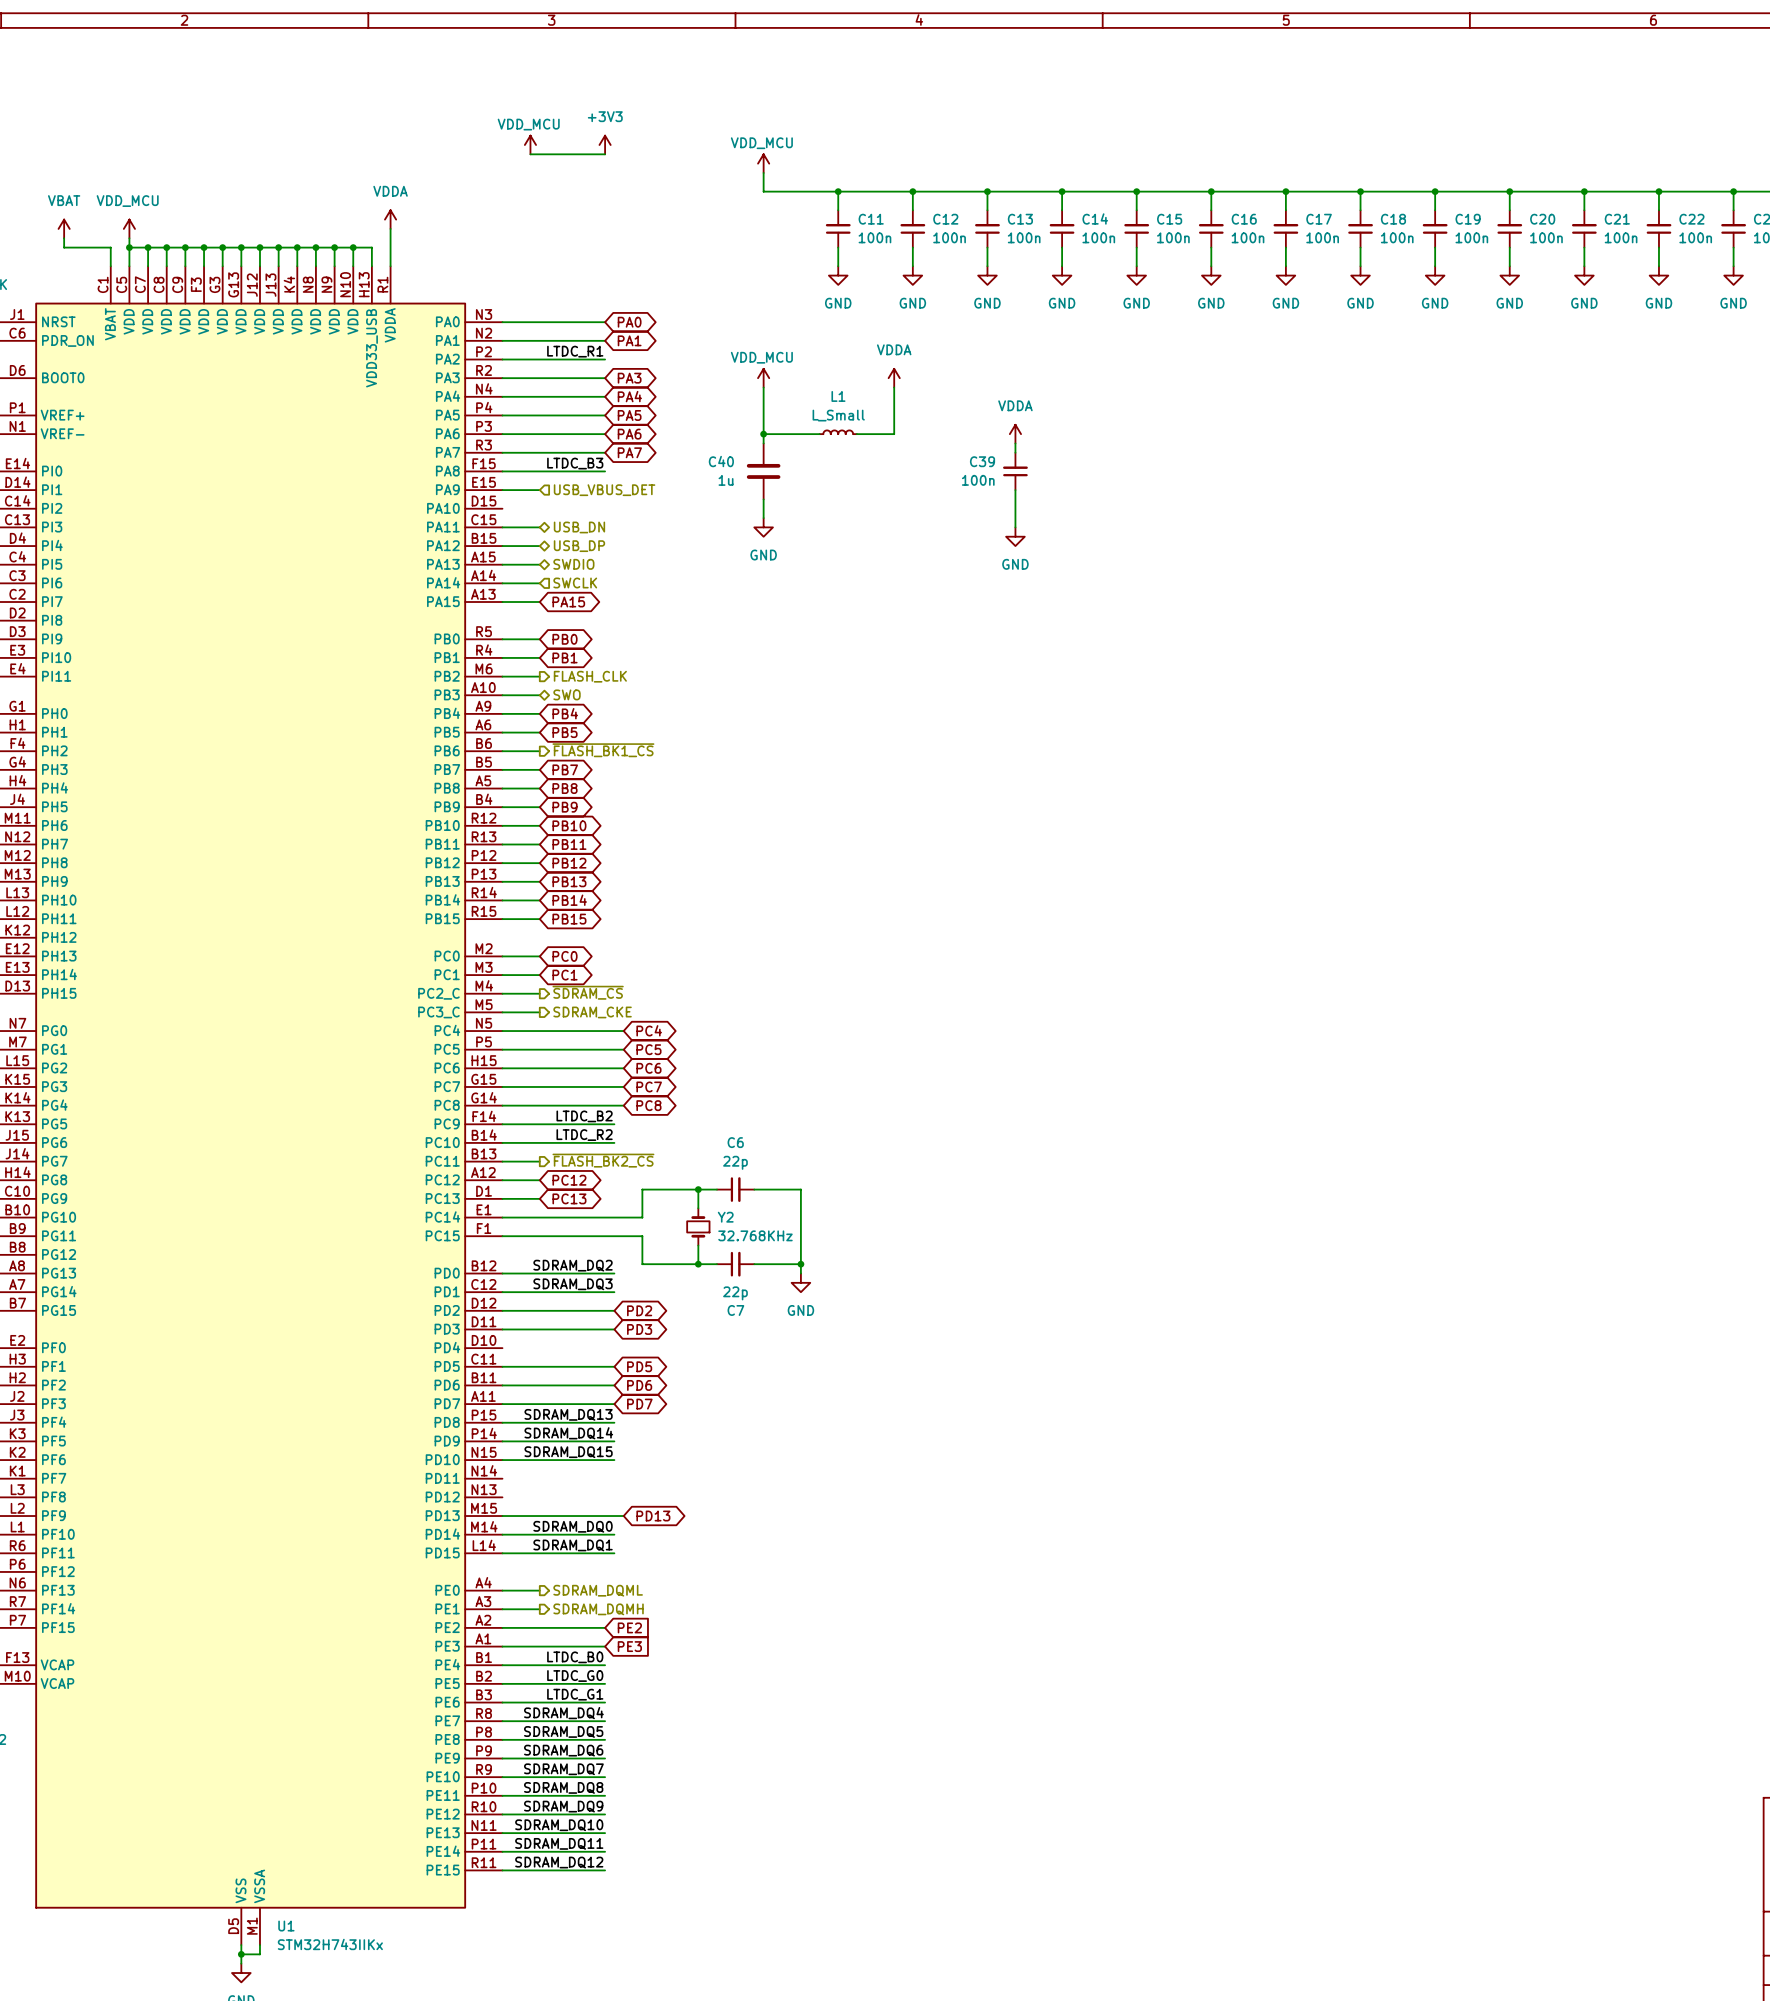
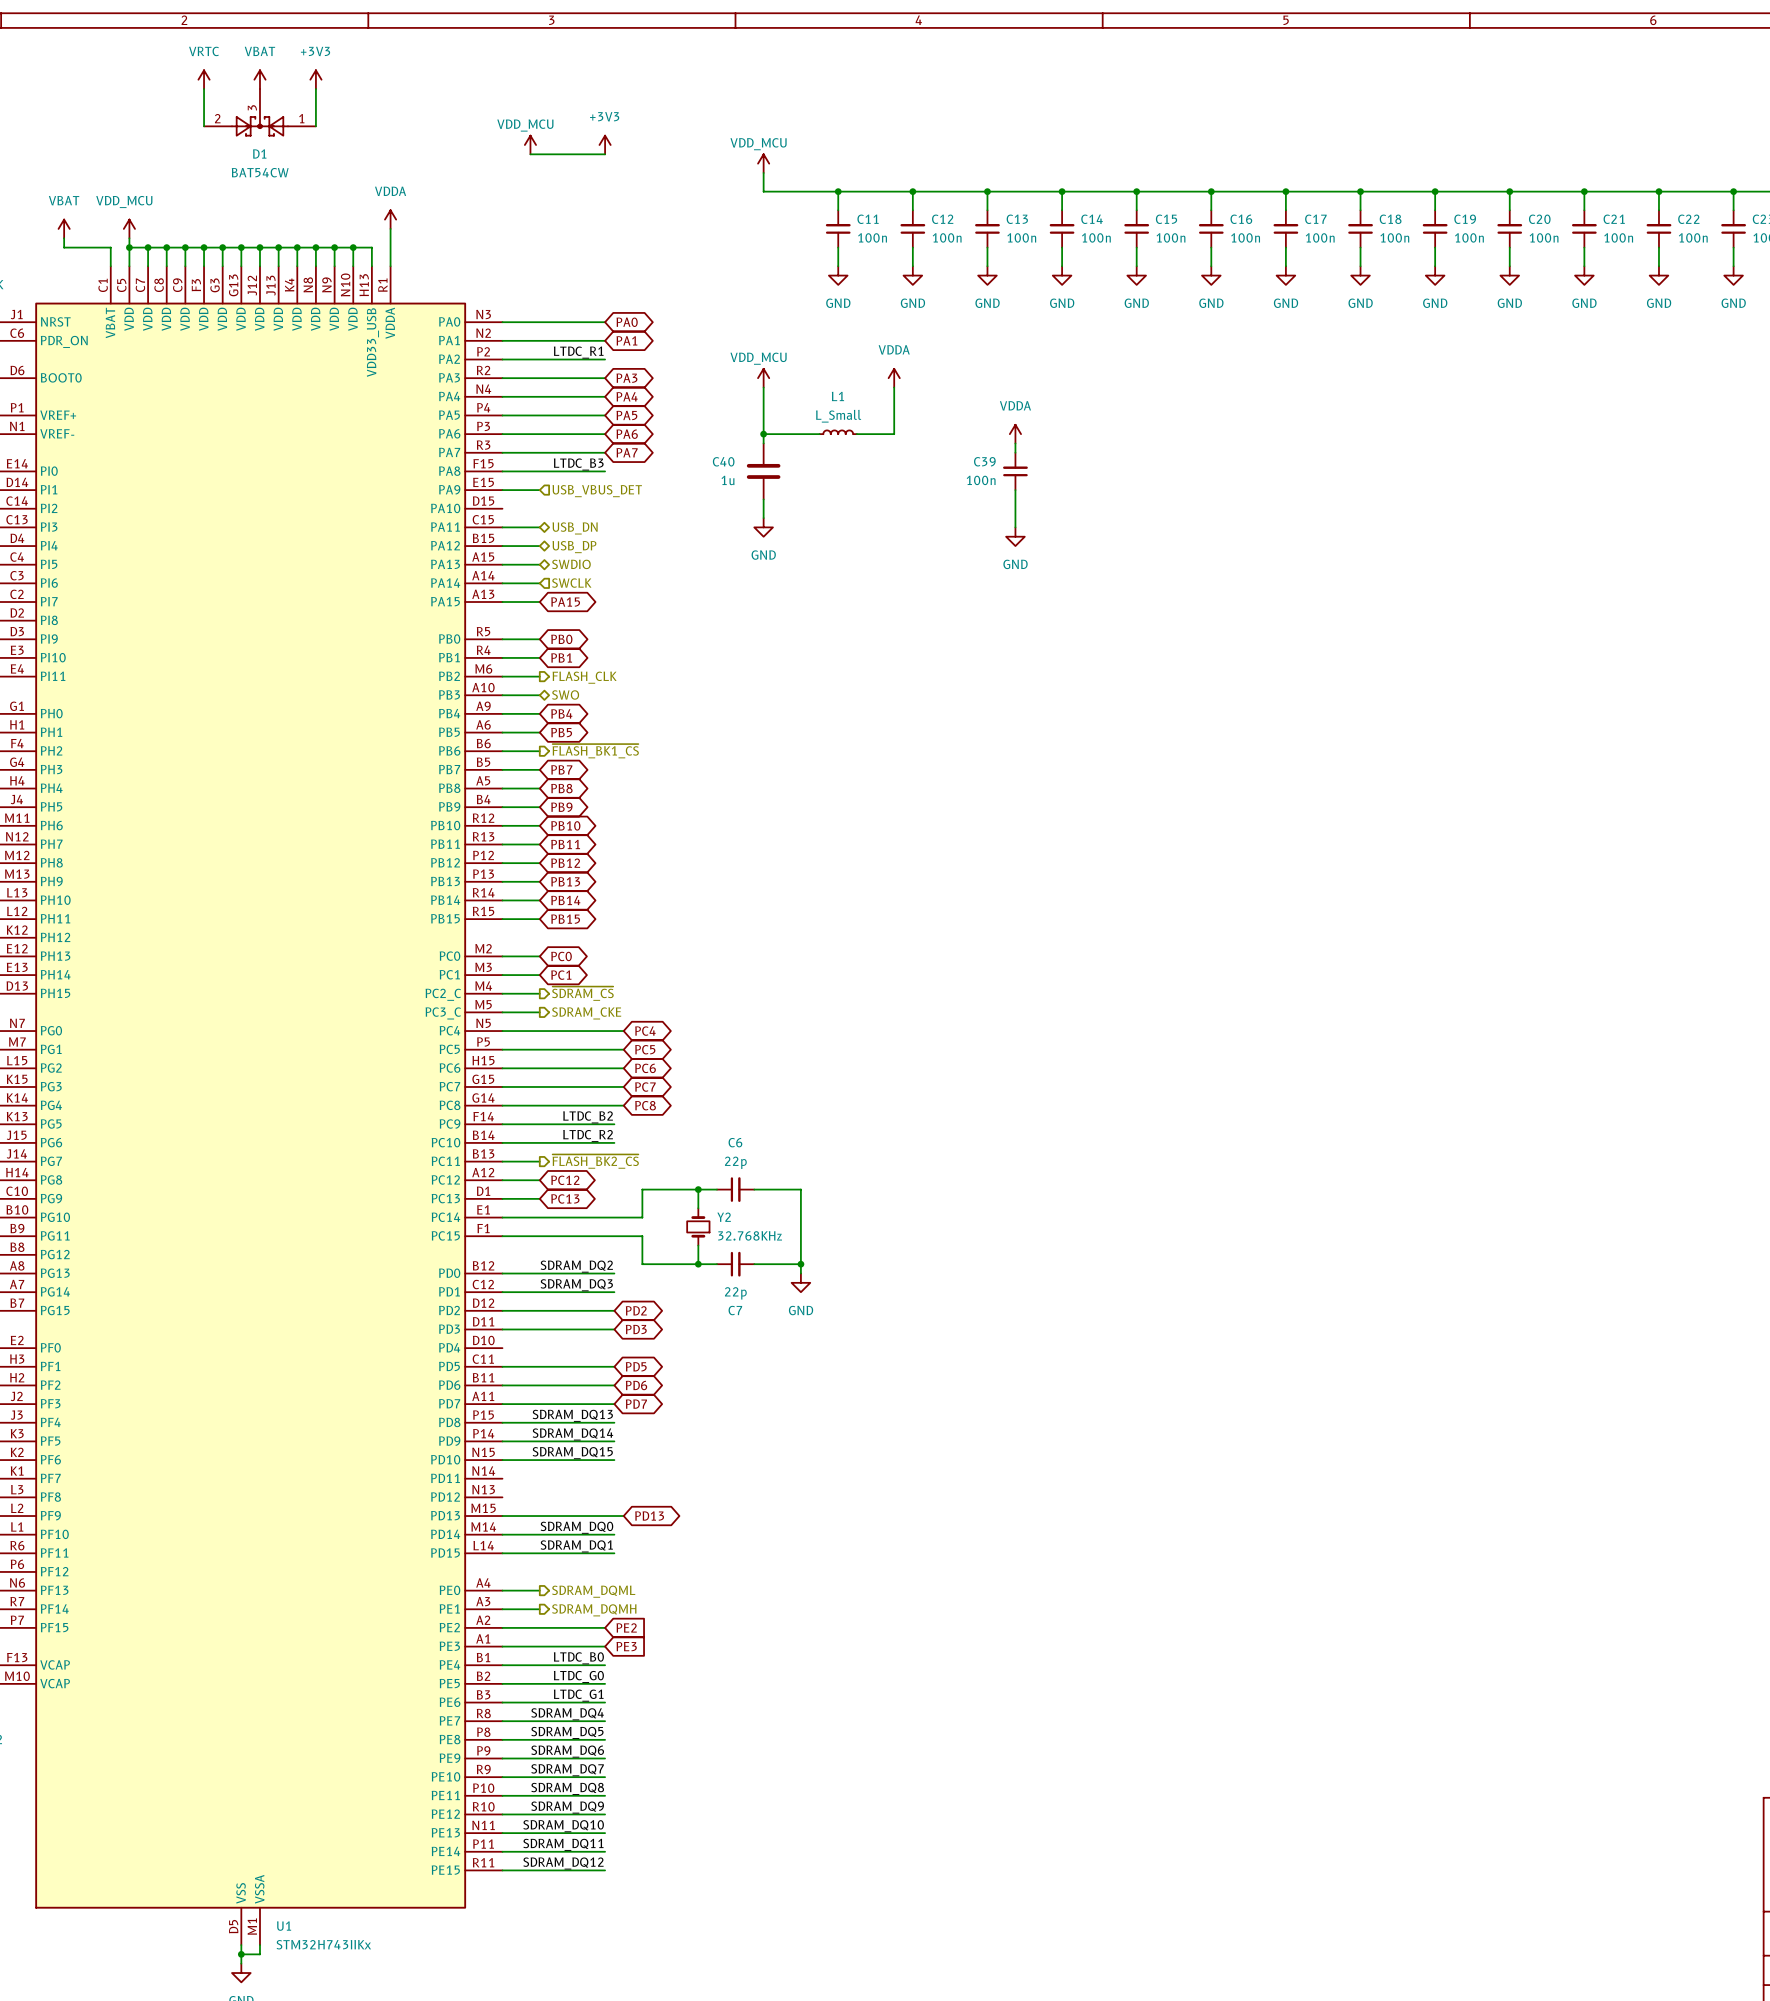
power symbol: none -> VRTC (204, 79)
power symbol: none -> VBAT (259, 79)
power symbol: none -> +3V3 (315, 79)
wire: none -> (204, 89) (204, 126)
wire: none -> (315, 89) (315, 126)
D1: none -> BAT54CW (259, 112)

